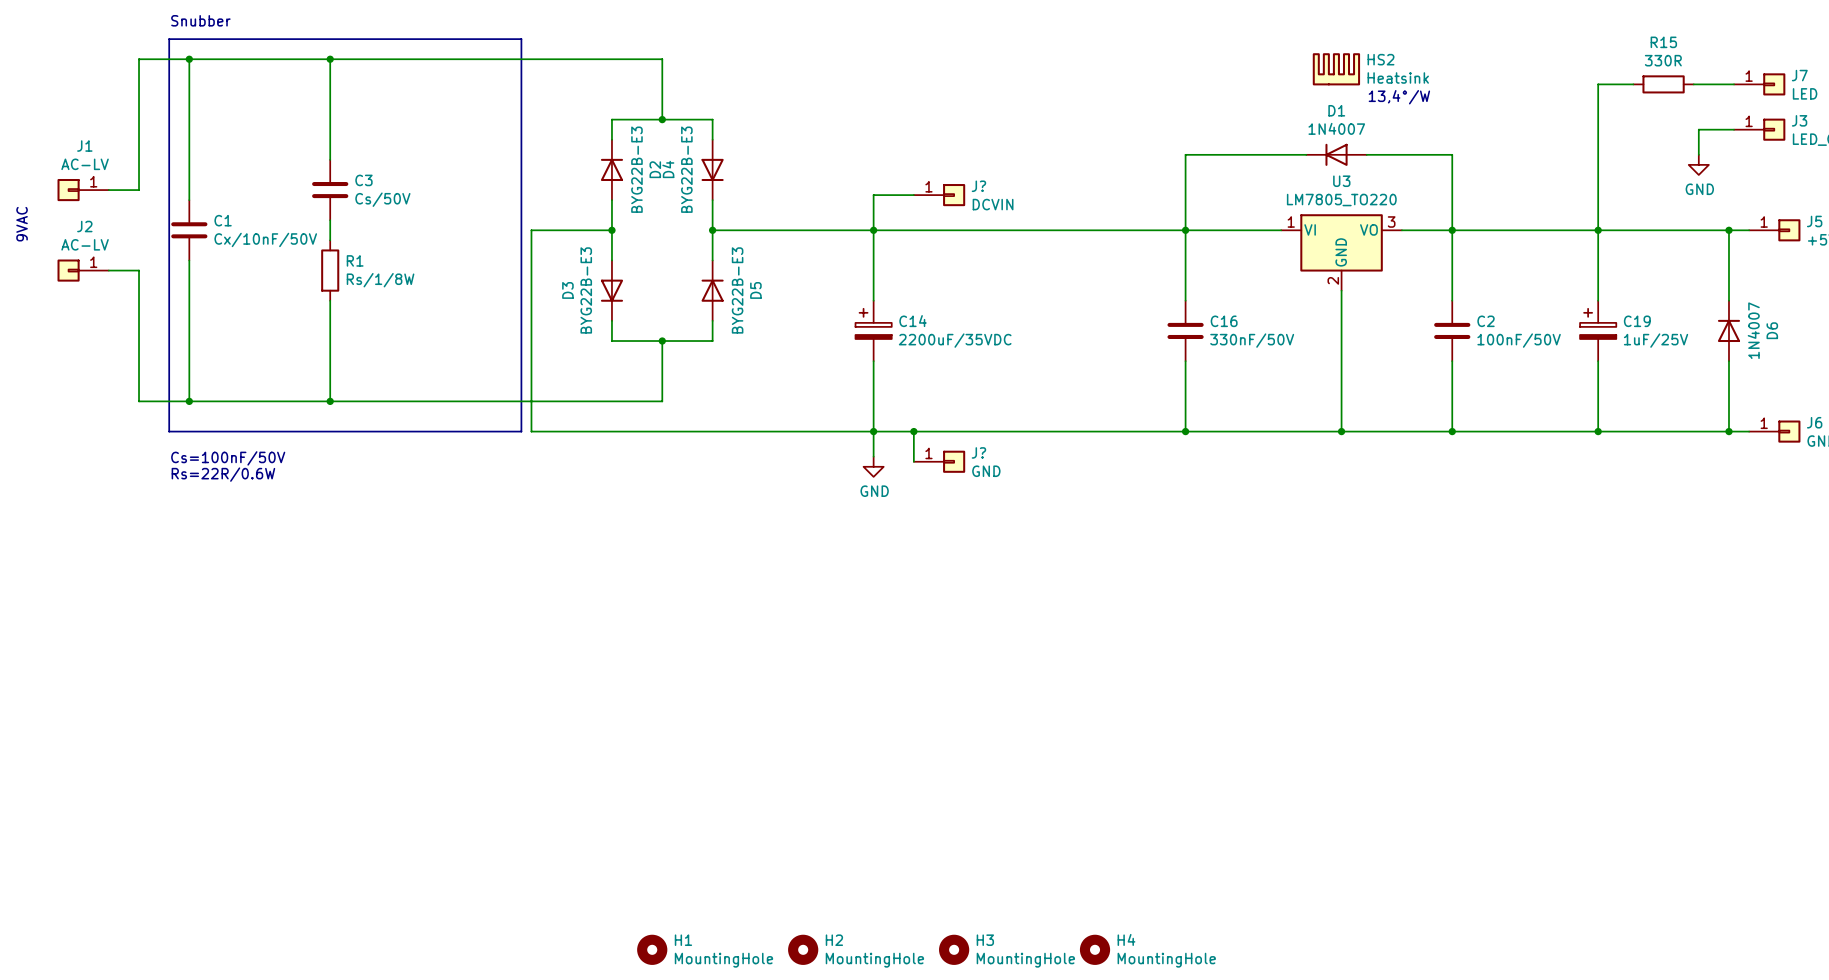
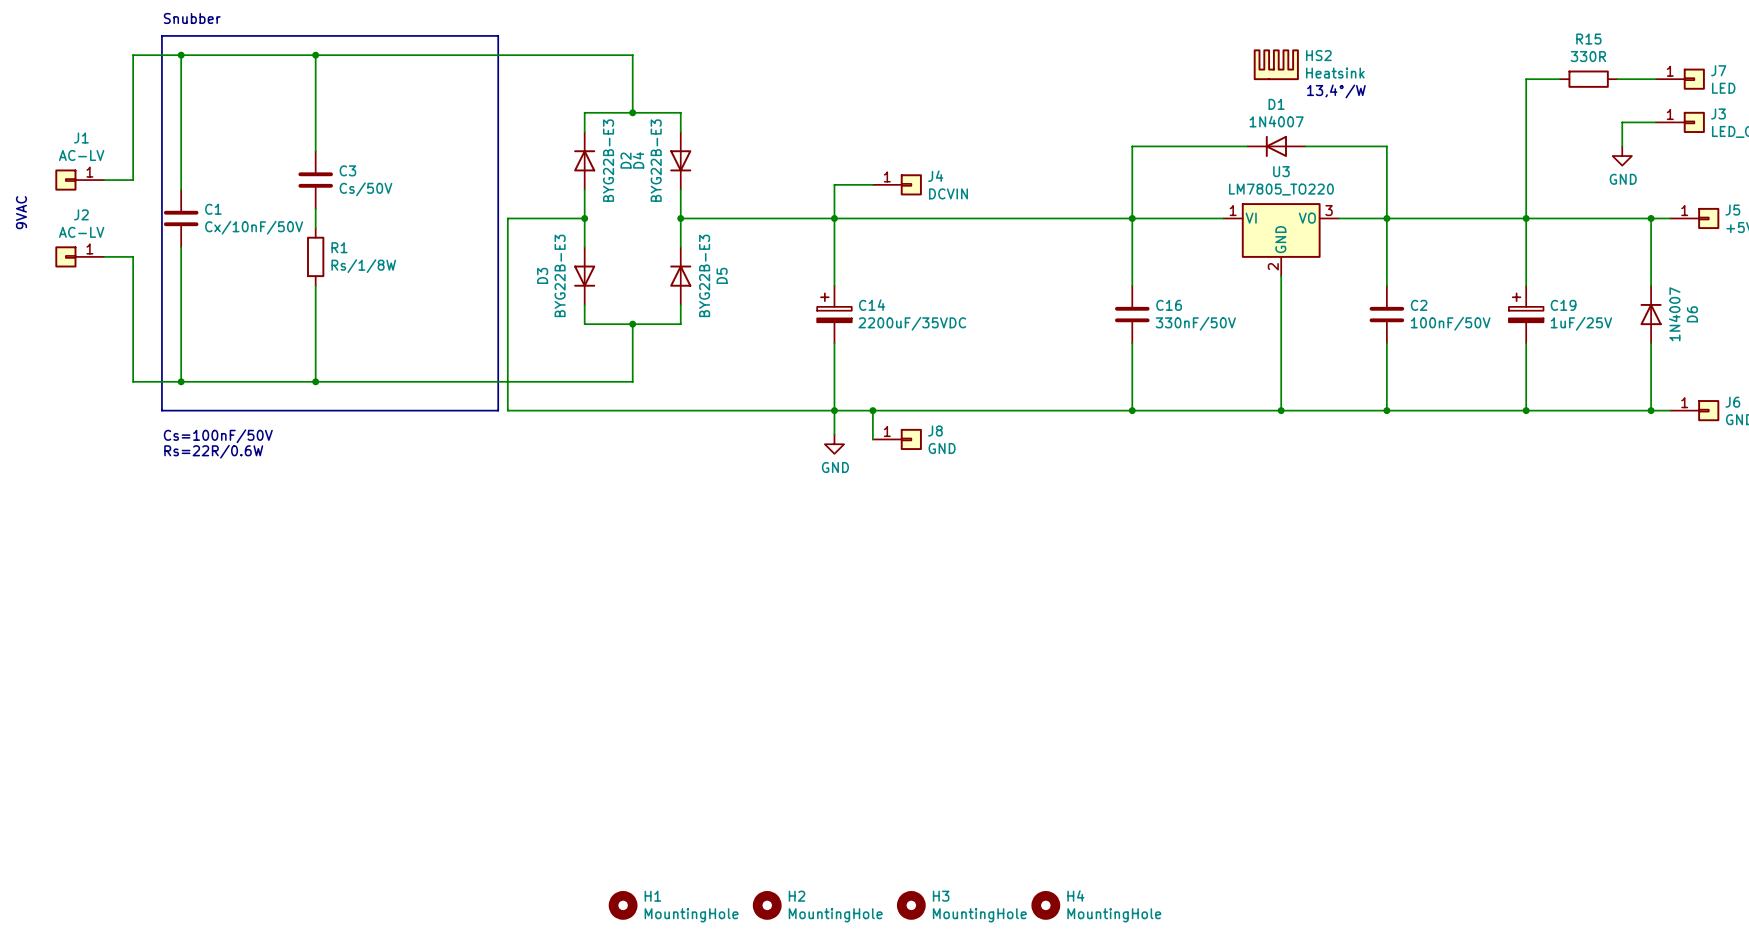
J? name: J? (978, 186) -> J4 (935, 176)
J? name: J? (978, 452) -> J8 (935, 431)

